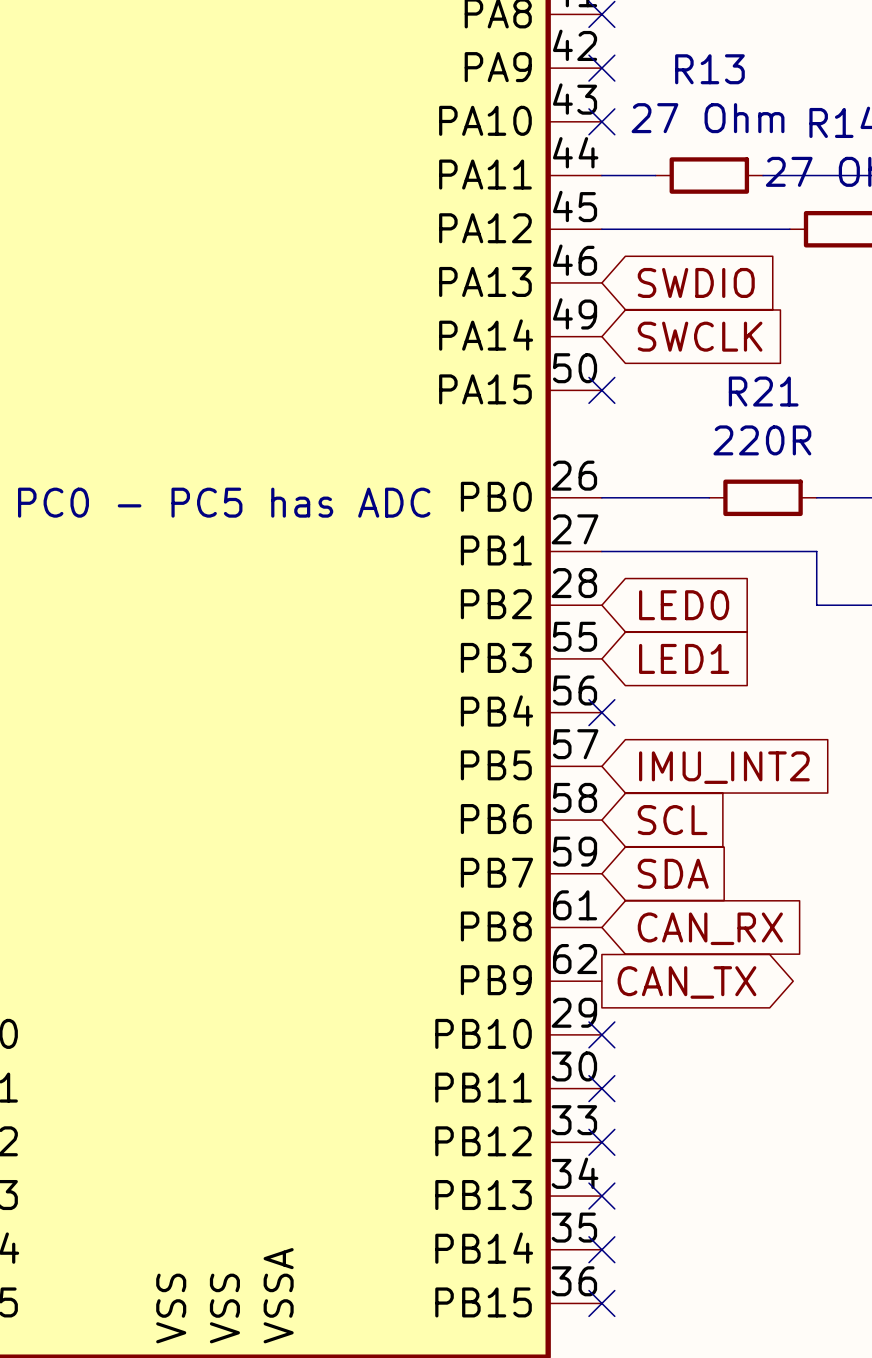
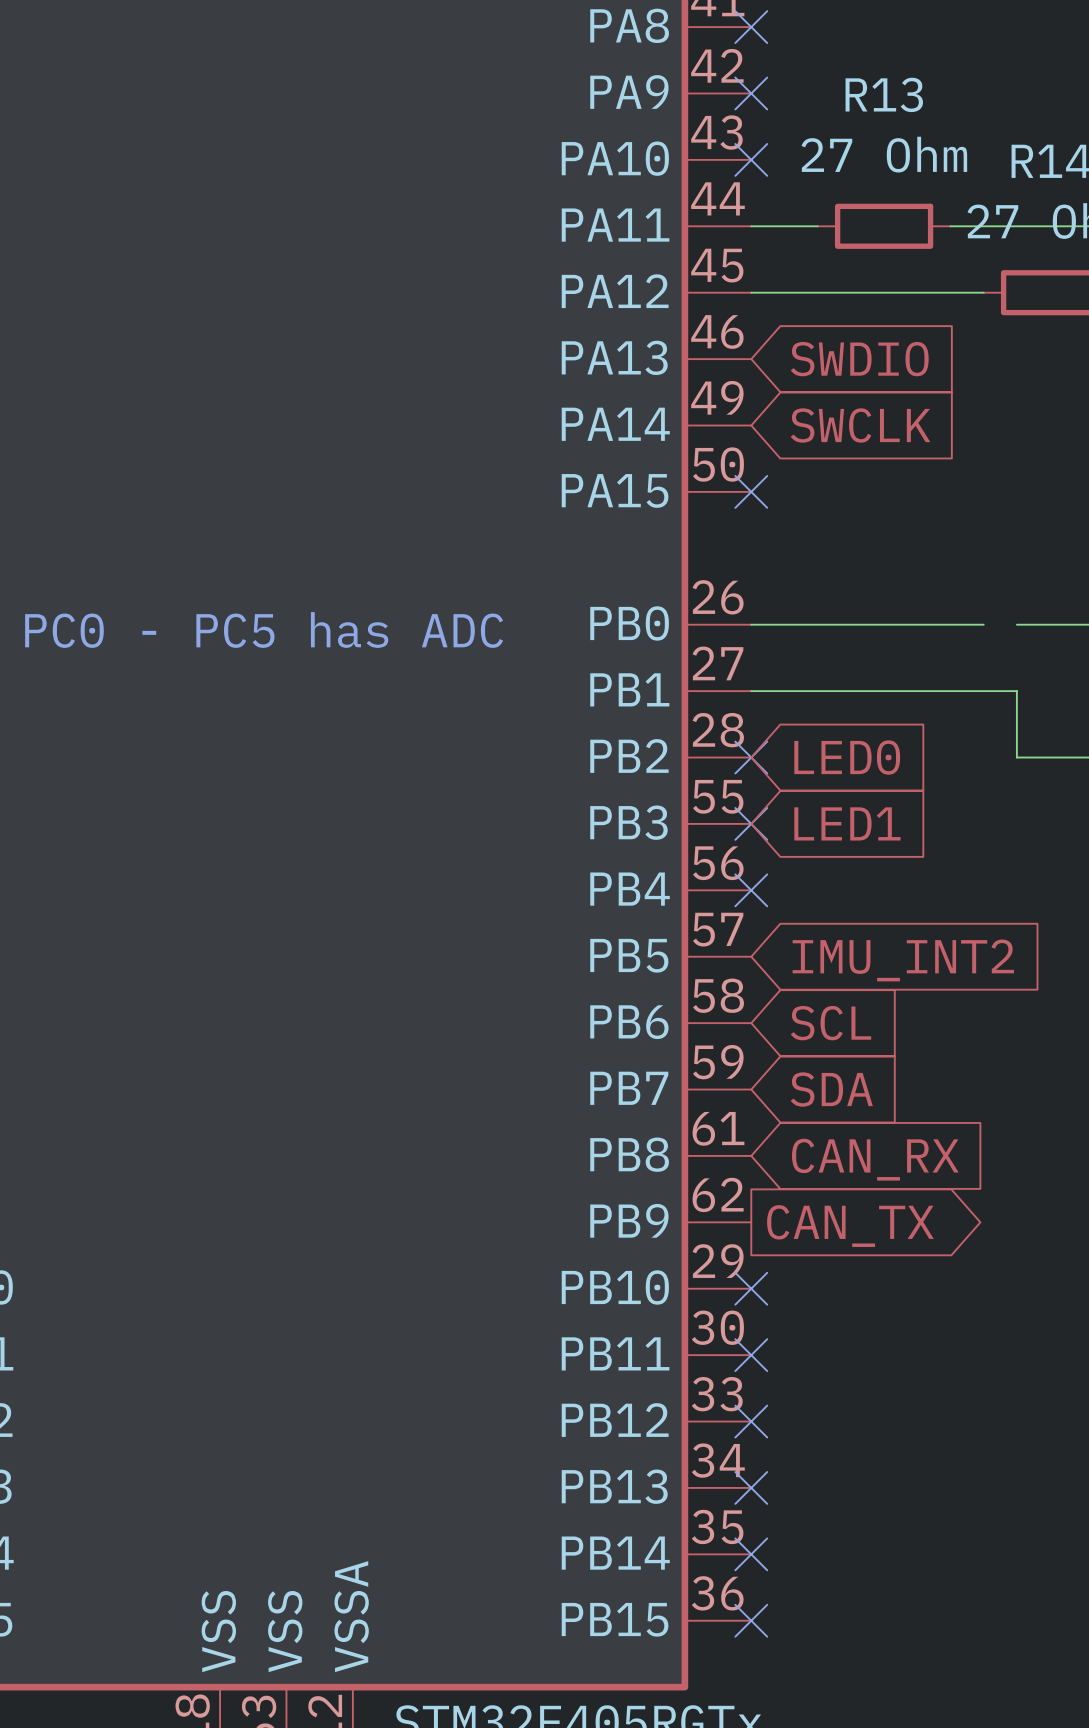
wire: none -> (884, 624) (983, 624)
R21: 220R (763, 497) -> none
no-connect mark: none -> (751, 757)
no-connect mark: none -> (751, 823)

